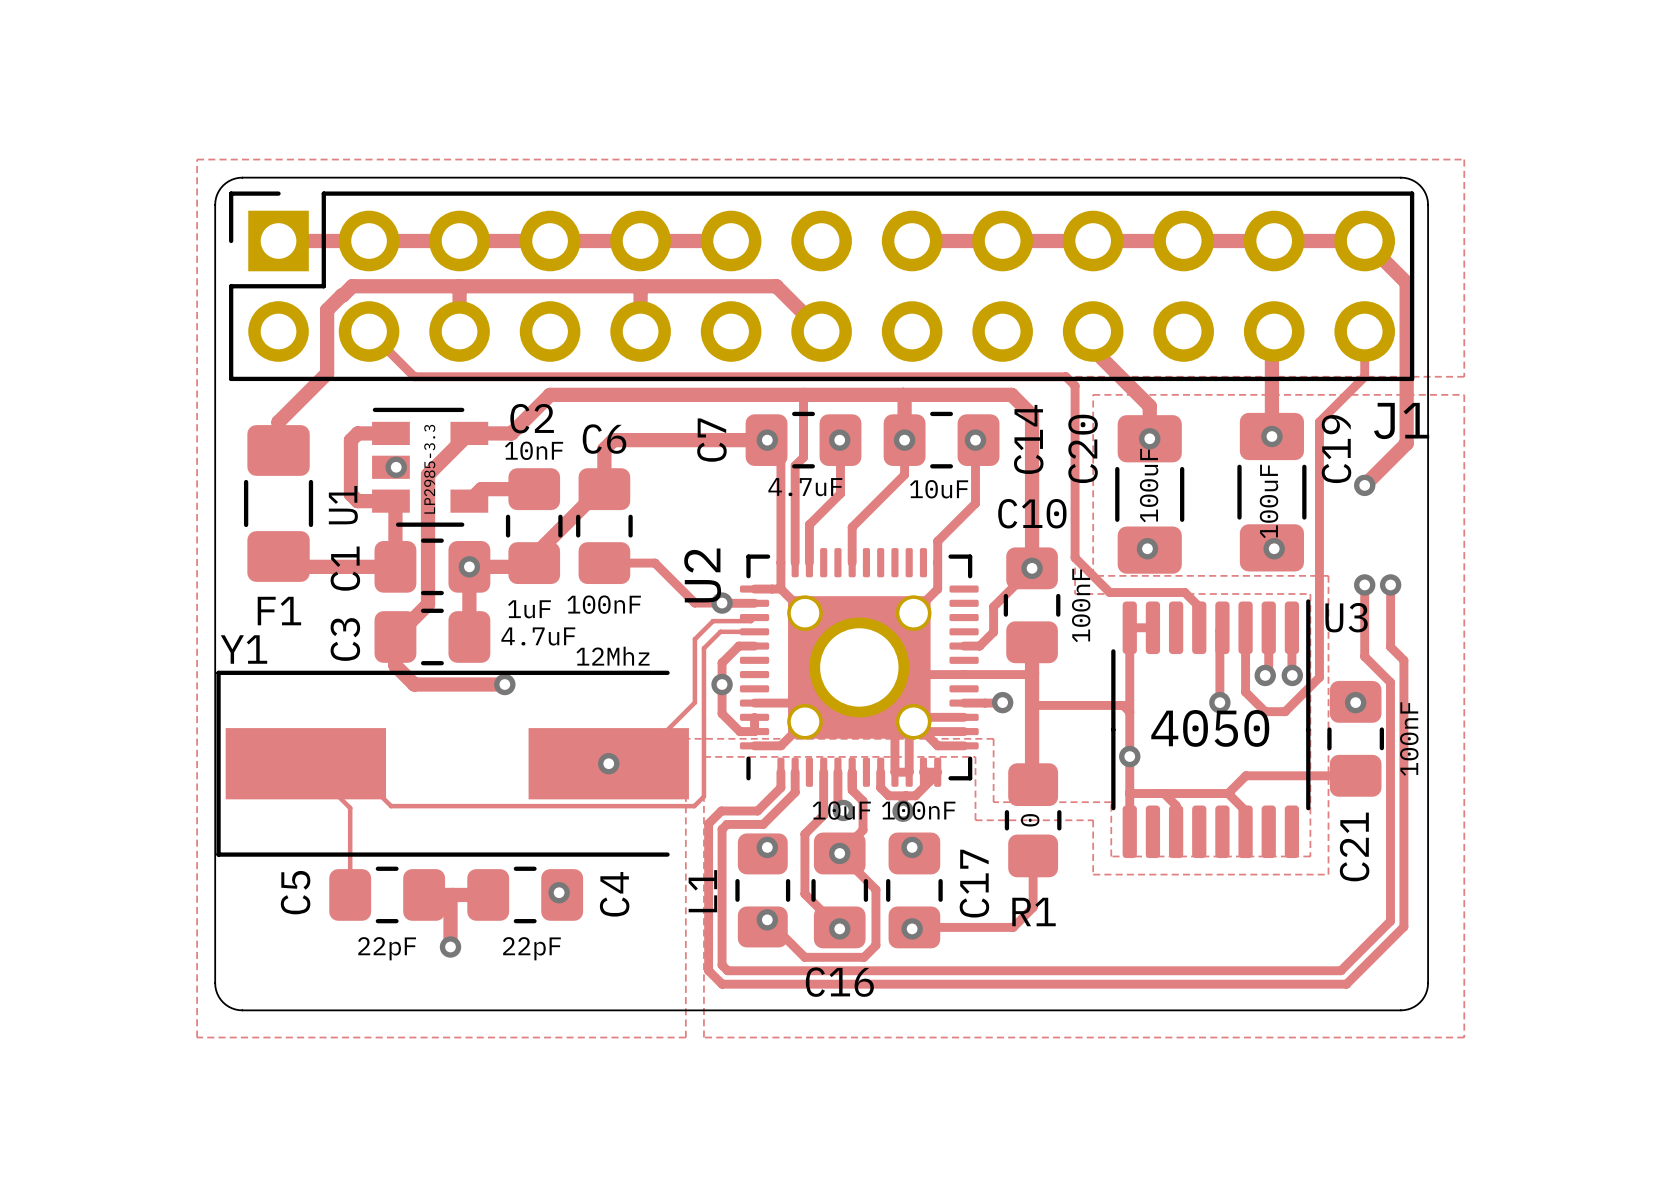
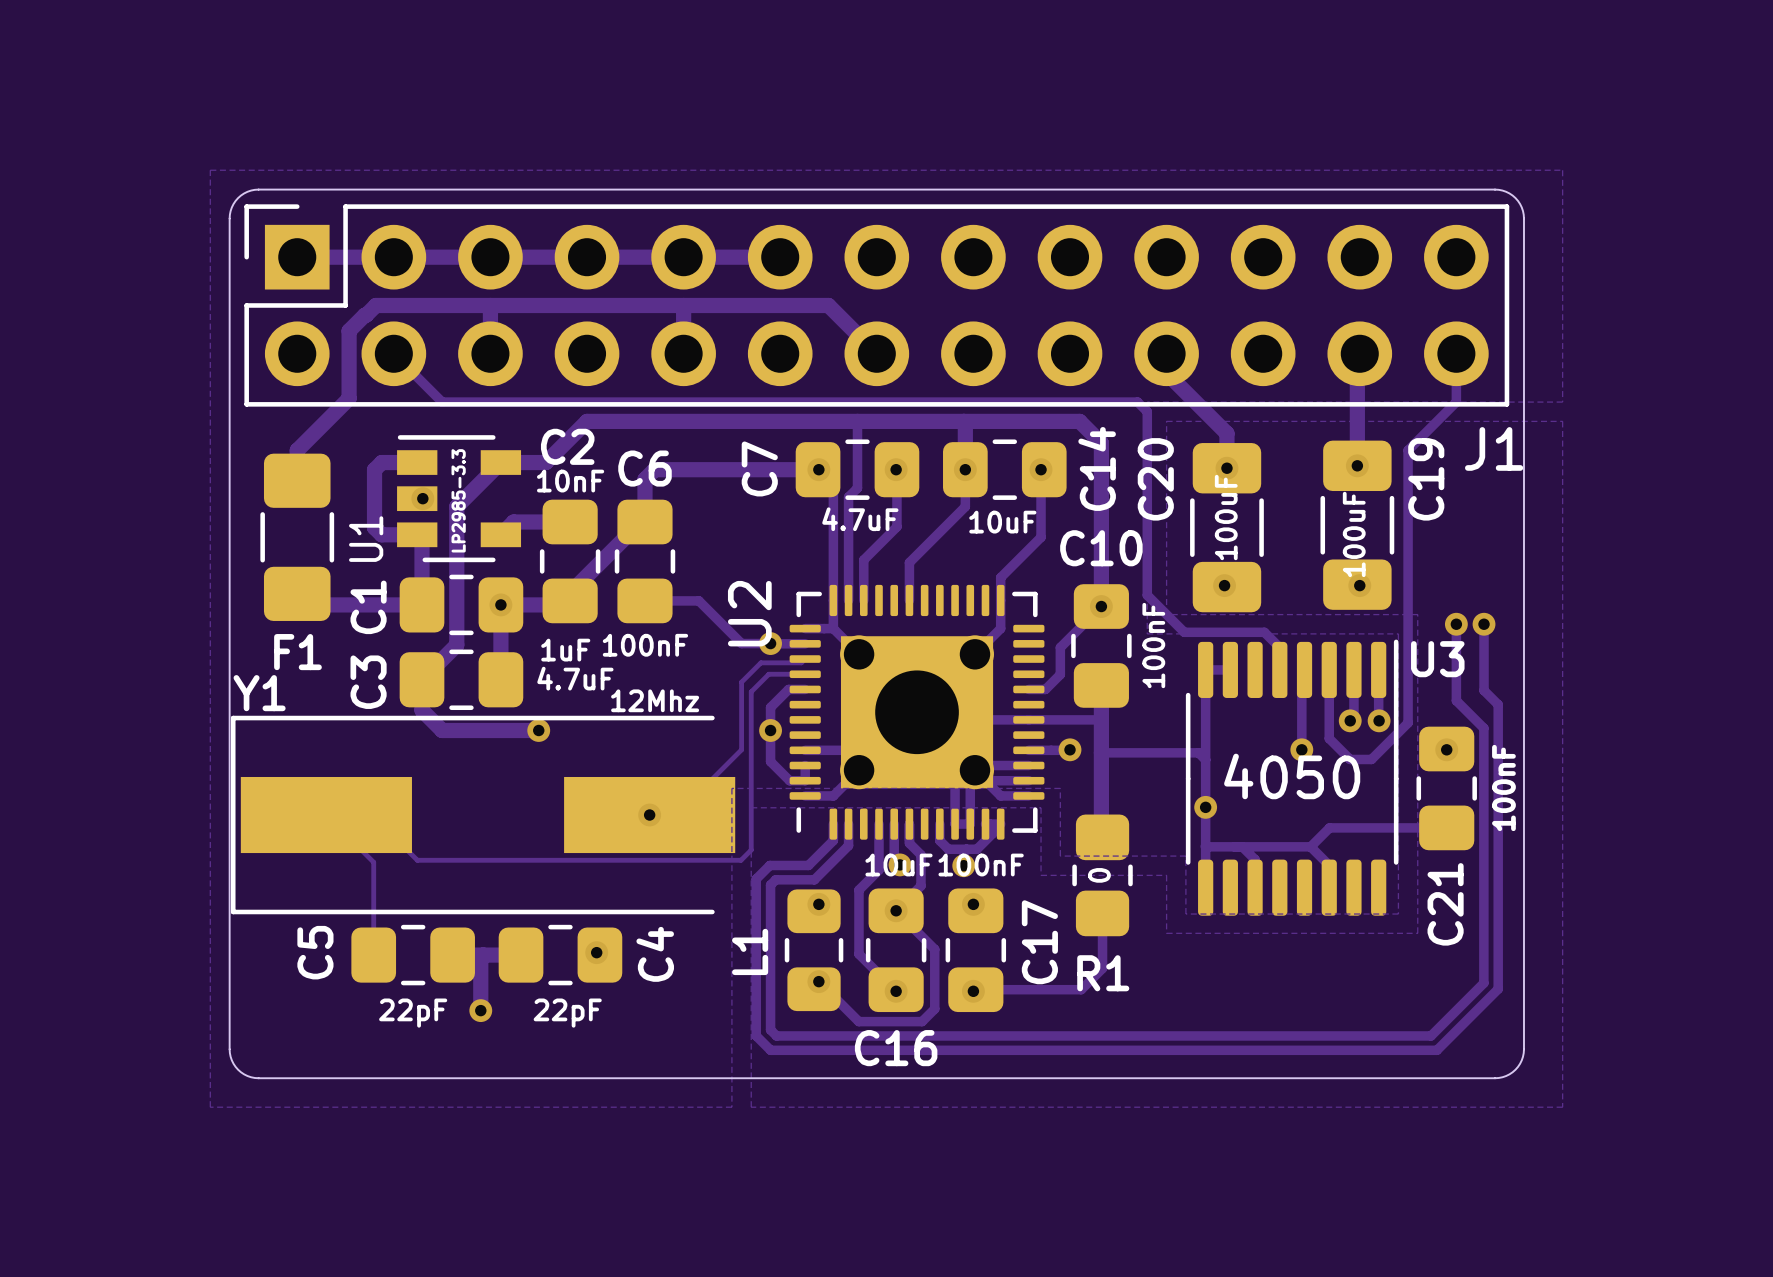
track: (912, 241) (1364, 241) (1406, 282) (1406, 443) (1364, 485) -> none
via: (1364, 485) -> none

